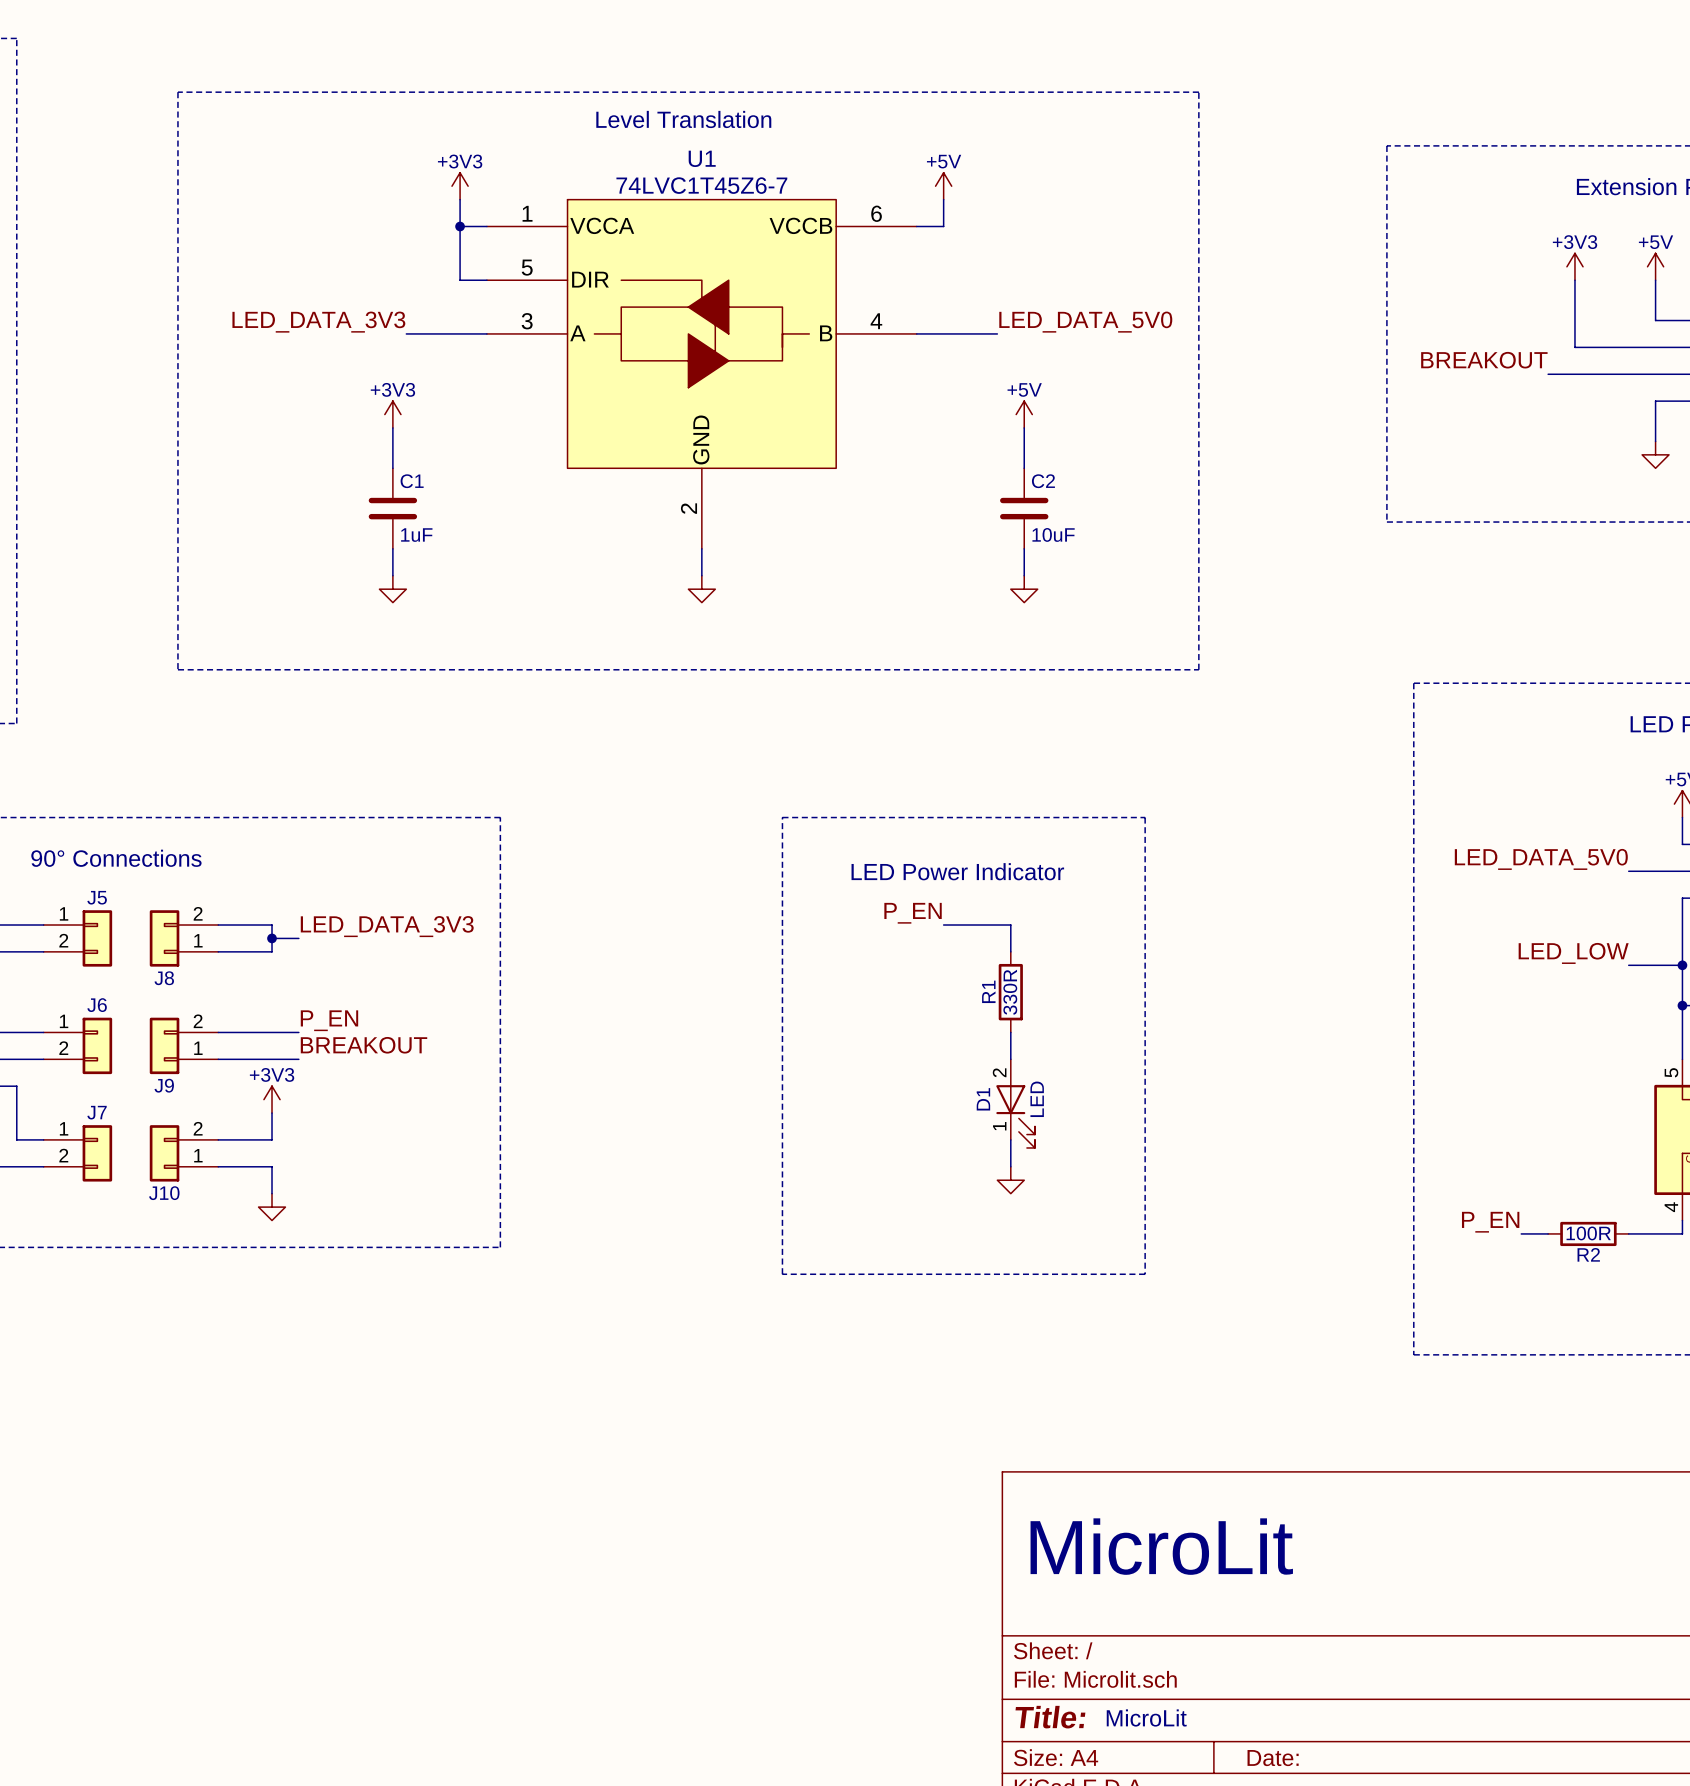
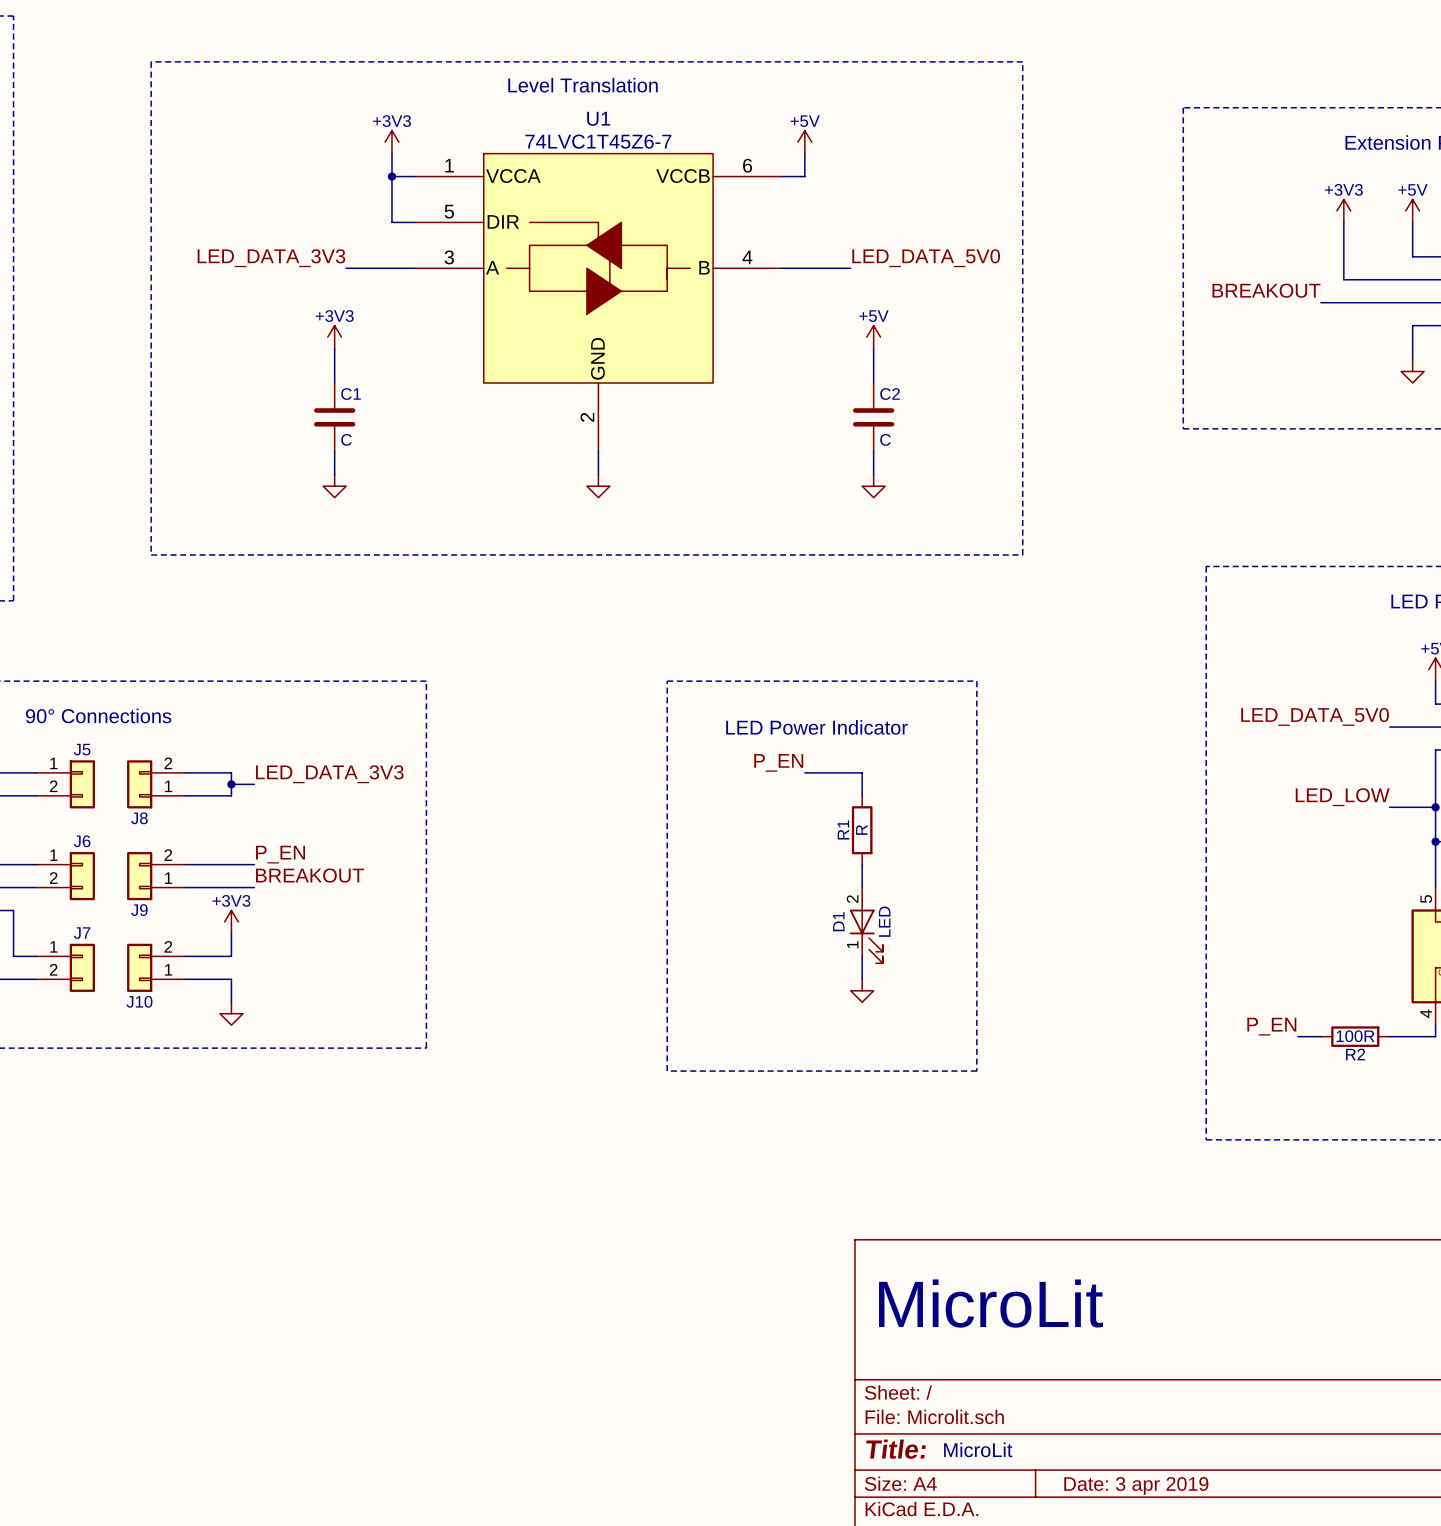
C2 value: 10uF (1053, 534) -> C (885, 439)
C1 value: 1uF (416, 535) -> C (346, 439)
R1 value: 330R (1010, 992) -> R (861, 829)
title block: Date: (1273, 1758) -> Date: 3 apr 2019 (1136, 1485)

